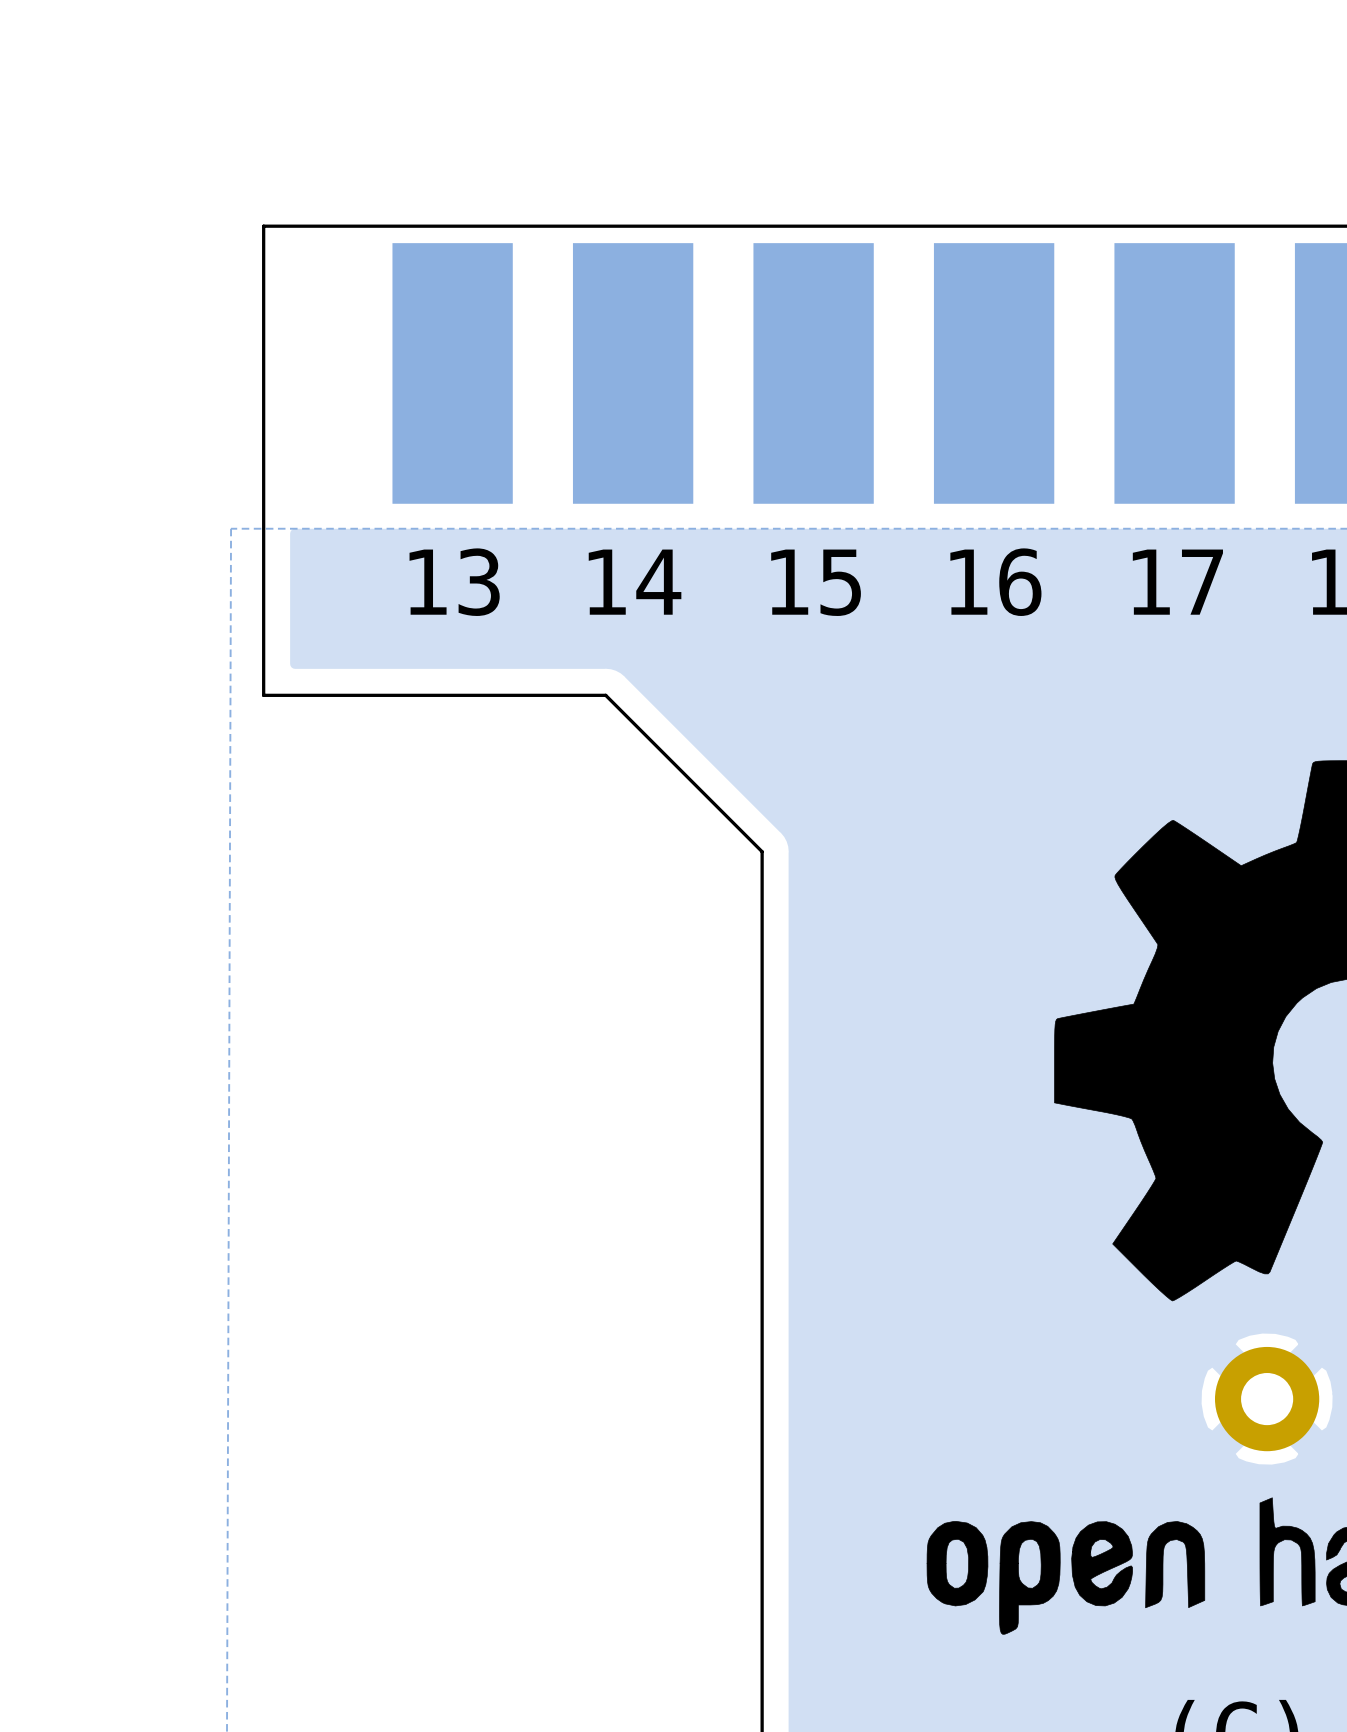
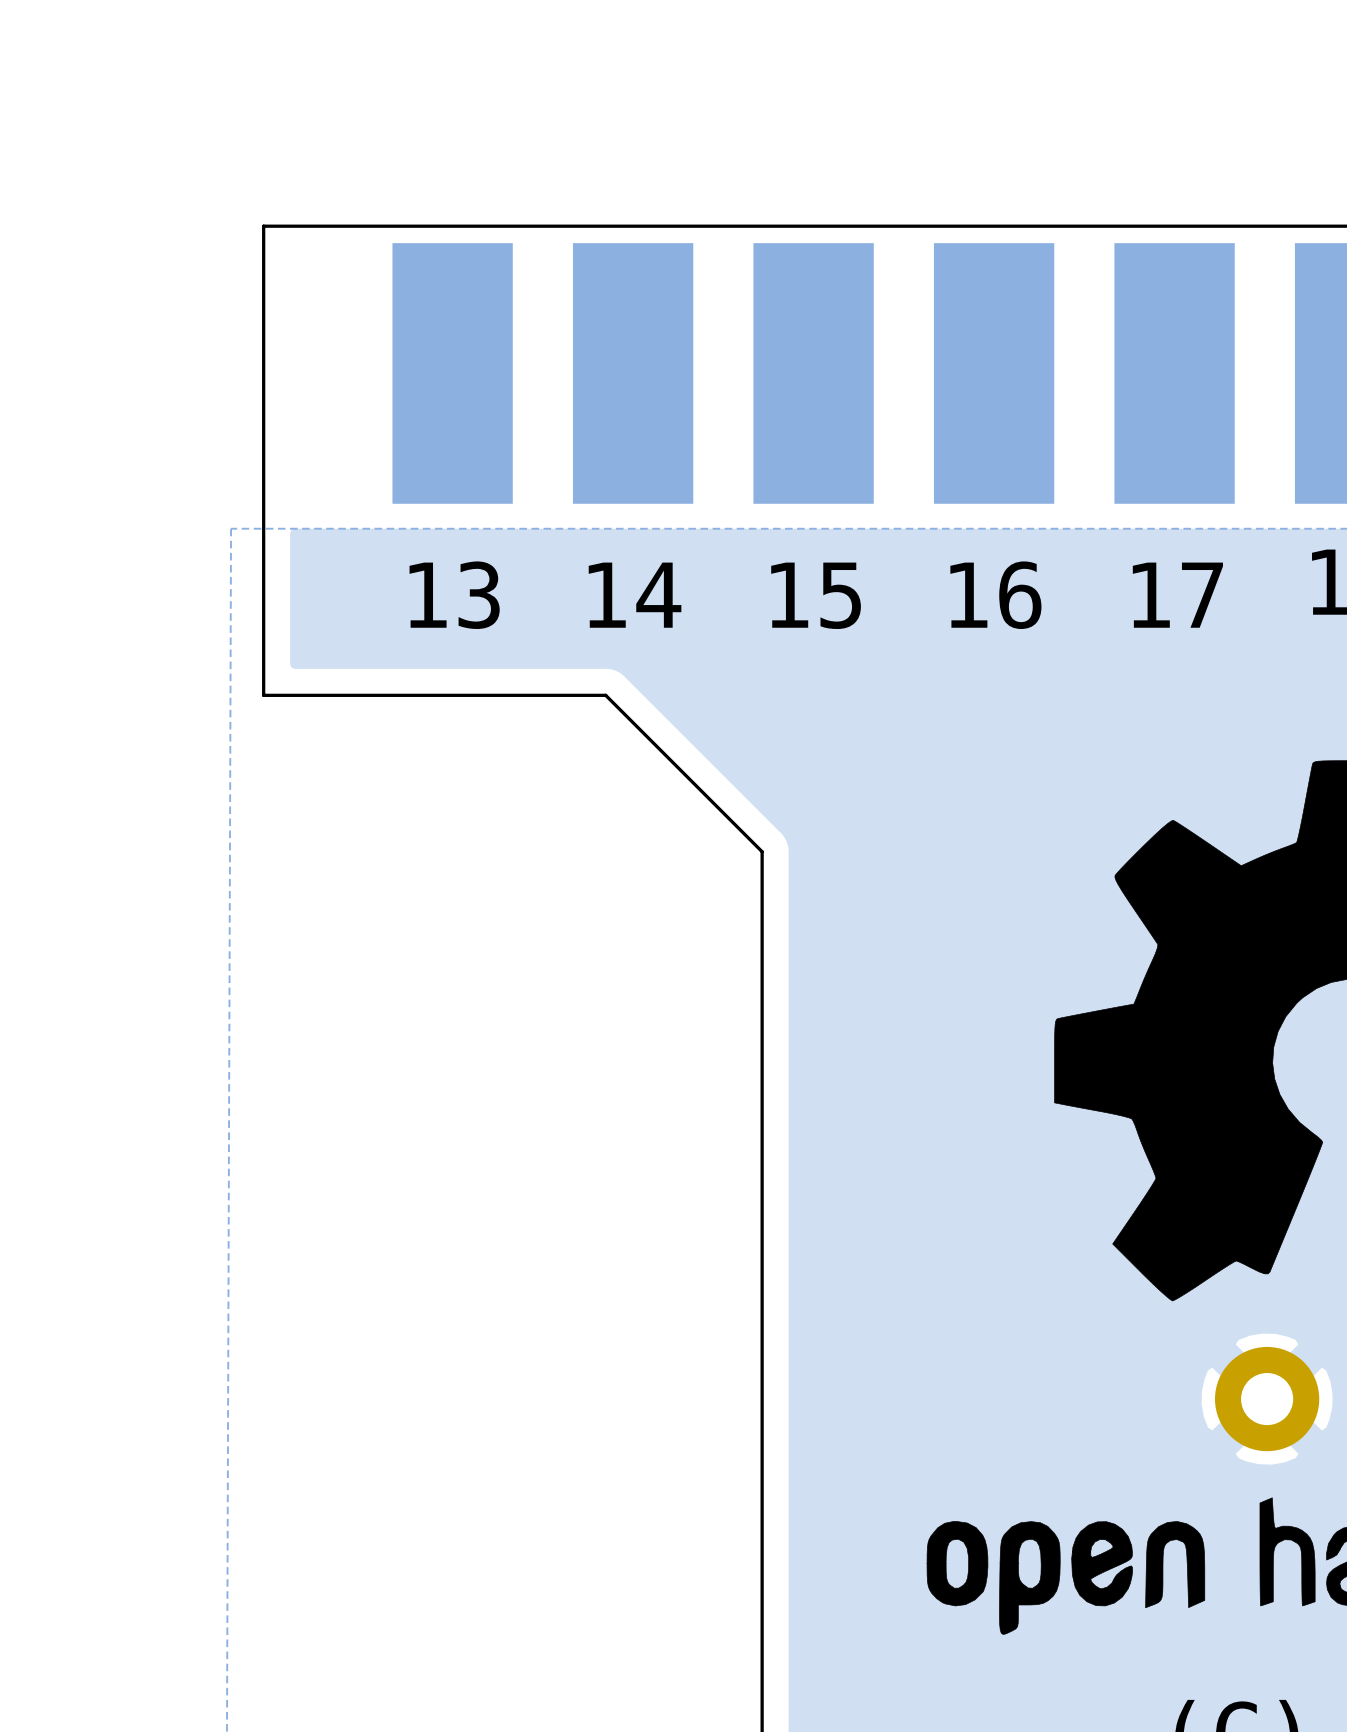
text position: 13 (454, 582) -> 13 (454, 595)
text position: 14 (635, 582) -> 14 (635, 595)
text position: 15 (816, 582) -> 15 (816, 595)
text position: 16 (995, 582) -> 16 (995, 595)
text position: 17 (1177, 582) -> 17 (1177, 595)

